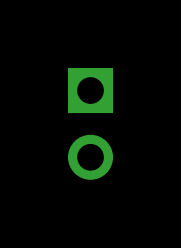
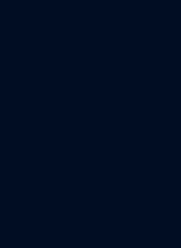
part: (90, 123) -> none

